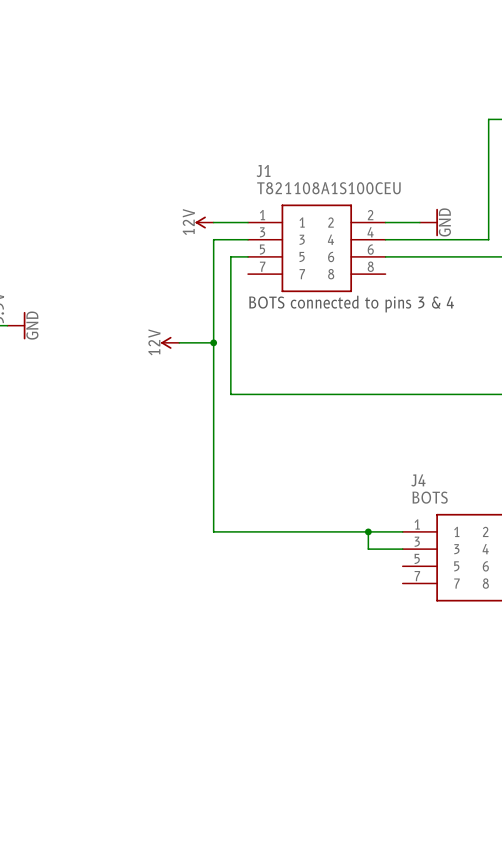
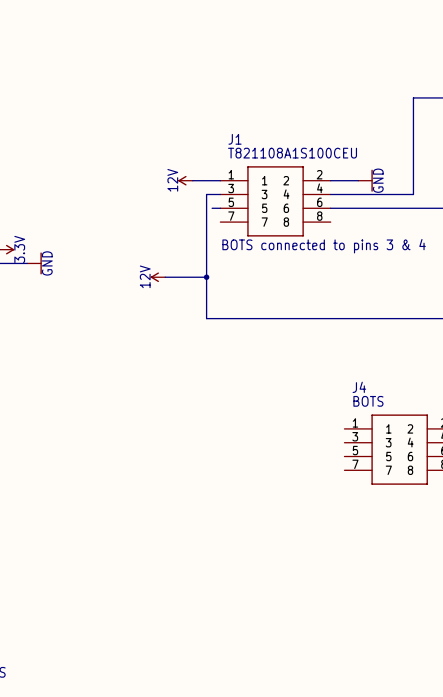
wire: (230, 239) (213, 239) (213, 531) (402, 531) -> none
wire: (230, 256) (237, 256) -> (206, 208) (206, 194)
wire: none -> (192, 277) (206, 277)
junction position: (213, 342) -> (206, 277)
wire: (368, 531) (368, 549) (402, 549) -> none
junction: (368, 531) -> none

